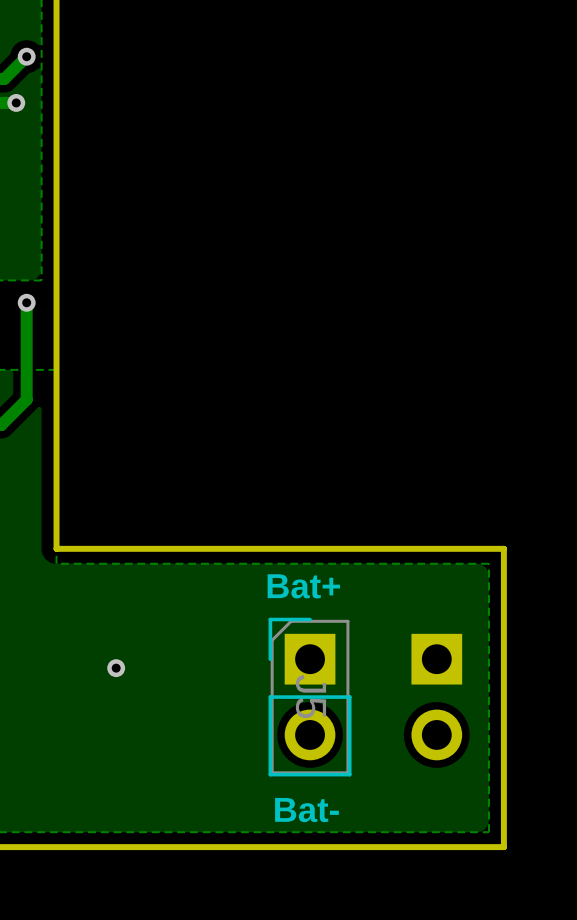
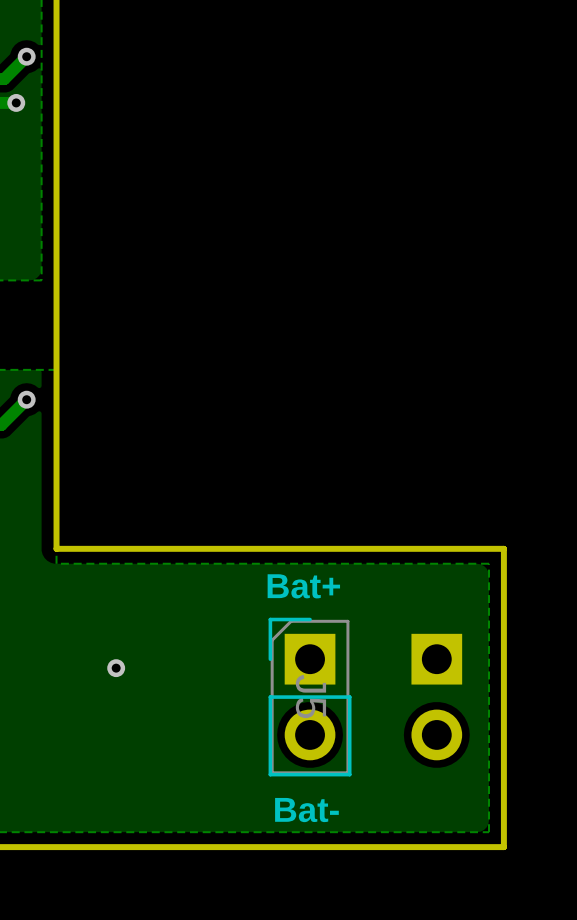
track: (26, 302) (26, 399) -> none
via position: (26, 302) -> (26, 399)

